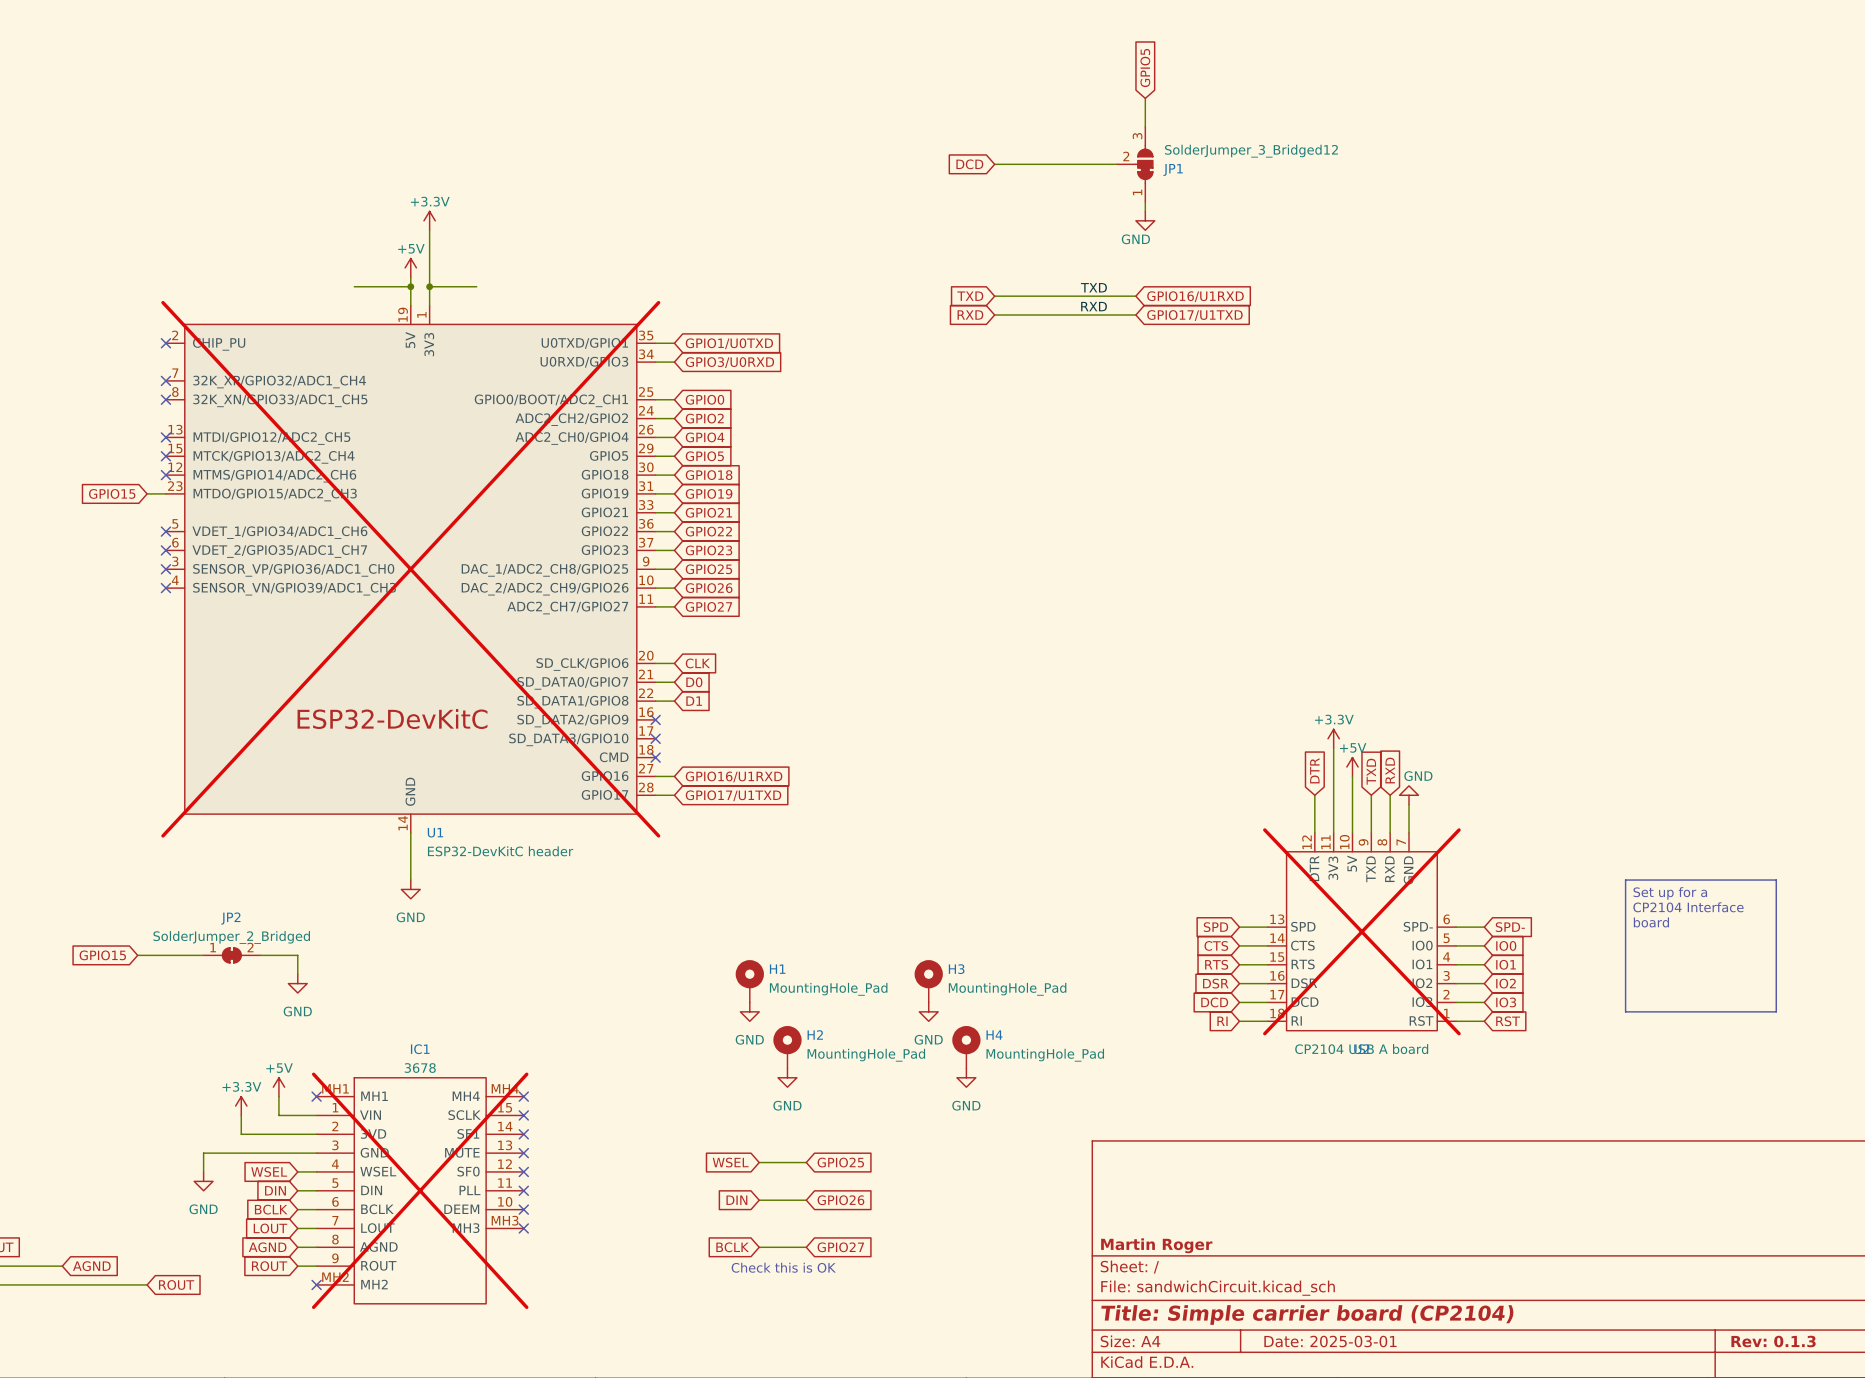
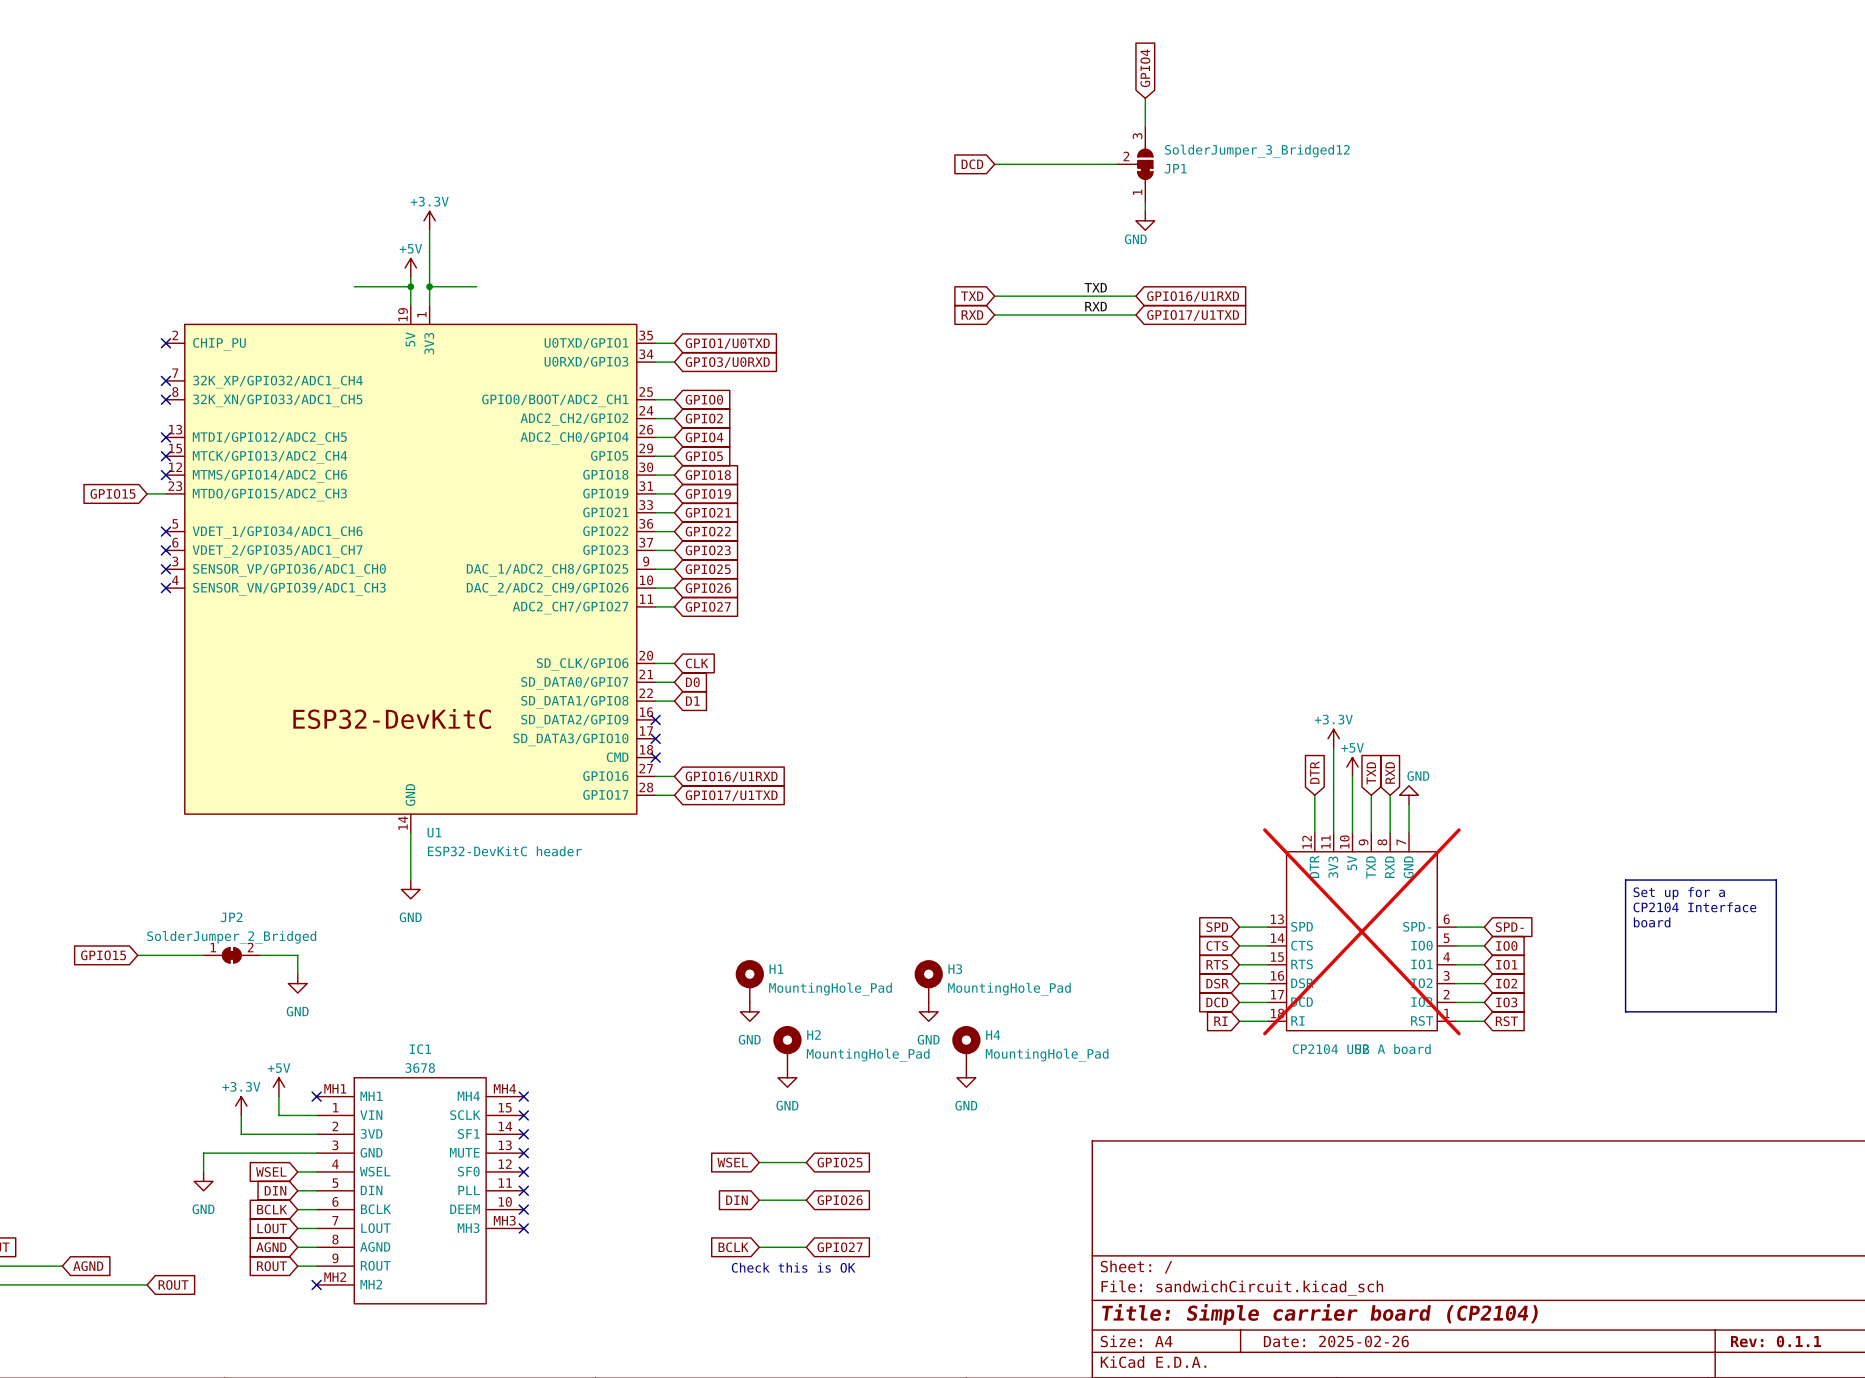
global label: GPIO5 (1145, 68) -> GPIO4 (1145, 68)
U1 do-not-place cross: (410, 569) -> none
IC1 do-not-place cross: (420, 1190) -> none
title block: Martin Roger (1156, 1245) -> none
title block: Date: 2025-03-01 (1330, 1341) -> Date: 2025-02-26 (1336, 1341)
title block: Rev: 0.1.3 (1773, 1341) -> Rev: 0.1.1 (1776, 1341)

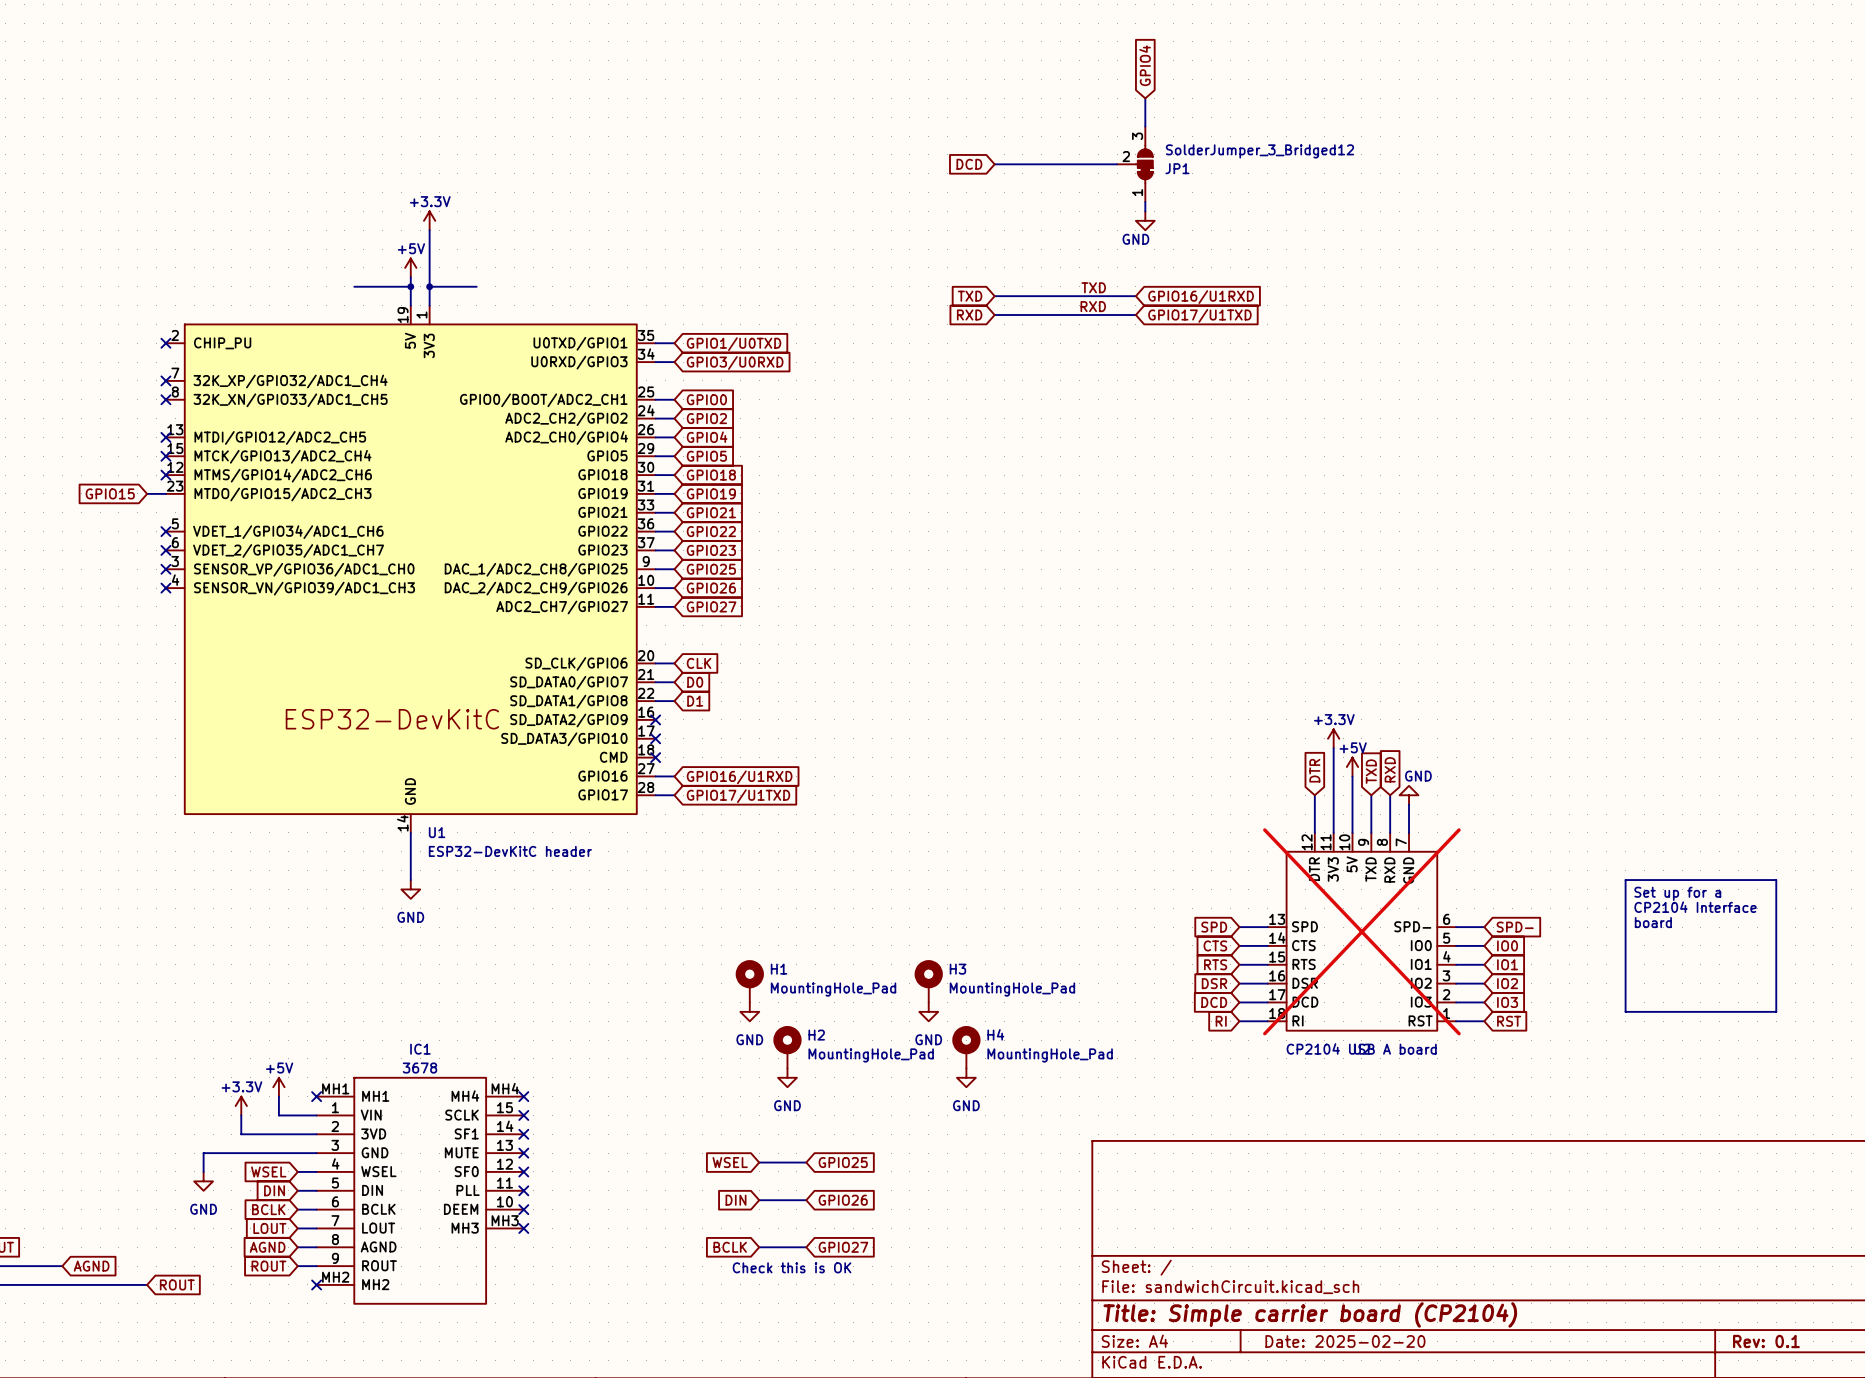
global label: GPIO15 (103, 955) -> none
wire: (137, 955) (203, 955) -> none
JP2: SolderJumper_2_Bridged (231, 955) -> none
wire: (260, 955) (297, 955) (297, 974) -> none
power symbol: GND (297, 983) -> none
title block: Date: 2025-02-26 (1336, 1341) -> Date: 2025-02-20 (1345, 1341)
title block: Rev: 0.1.1 (1776, 1341) -> Rev: 0.1 (1766, 1341)

